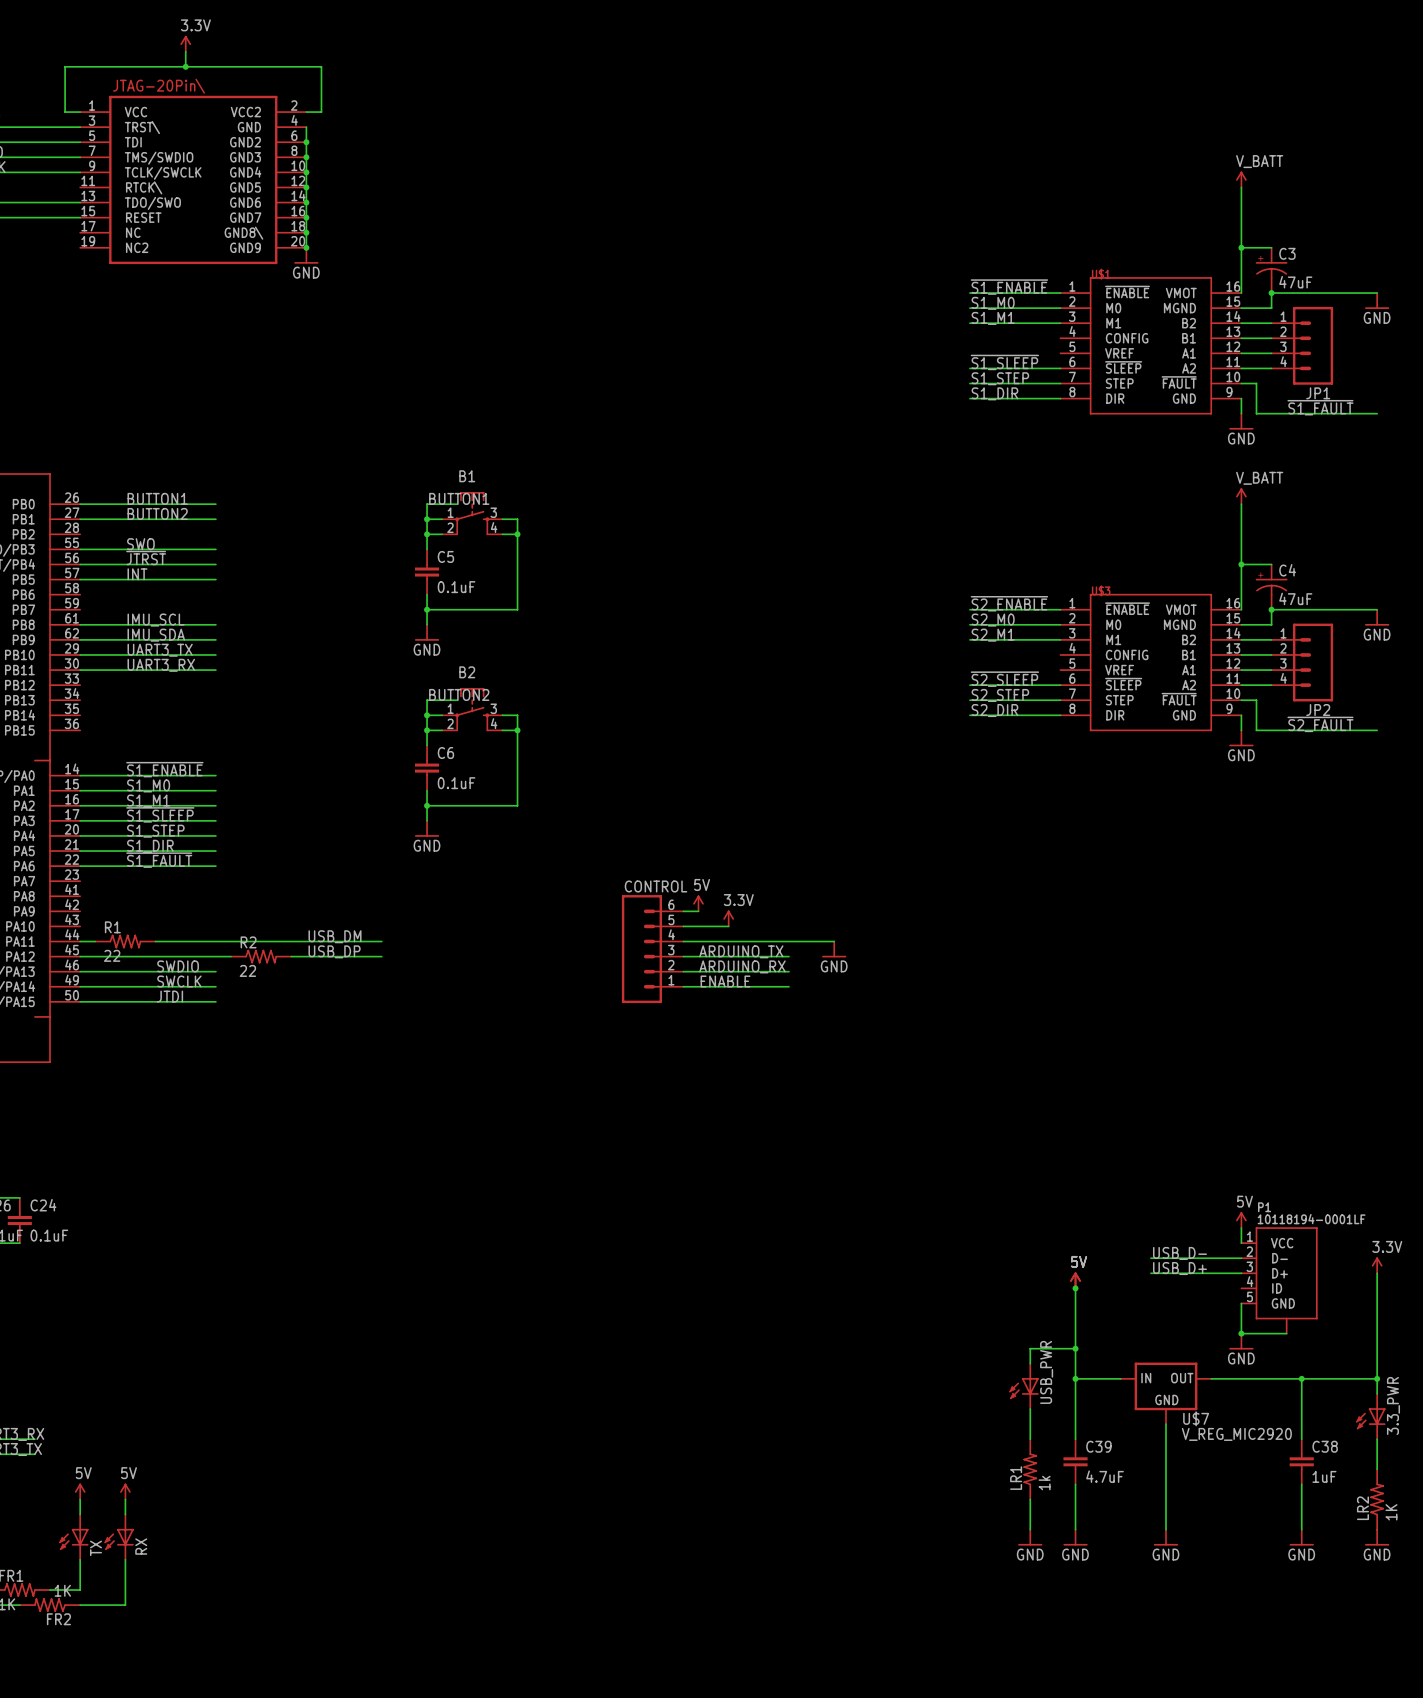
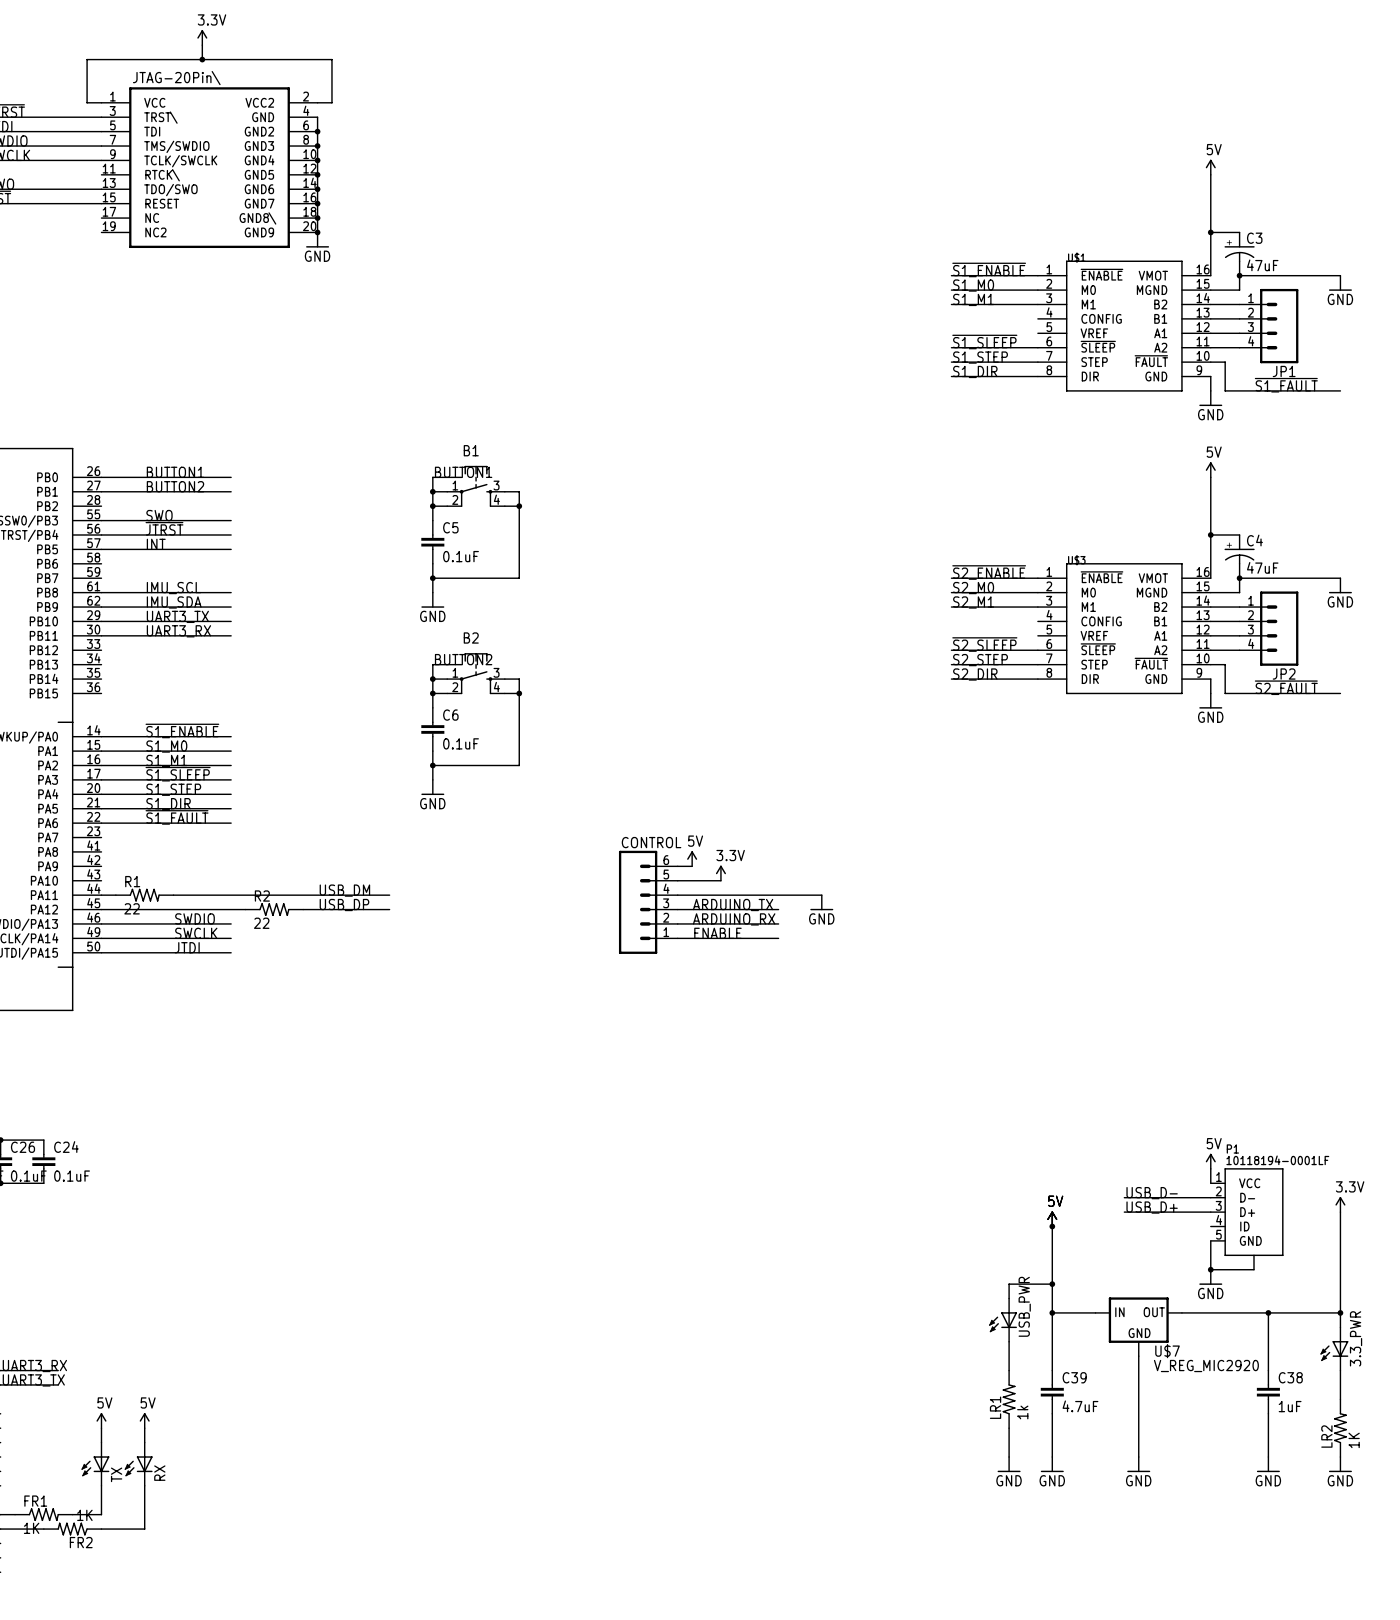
power symbol: V_BATT (1241, 179) -> 5V (1210, 167)
power symbol: V_BATT (1241, 496) -> 5V (1210, 469)

